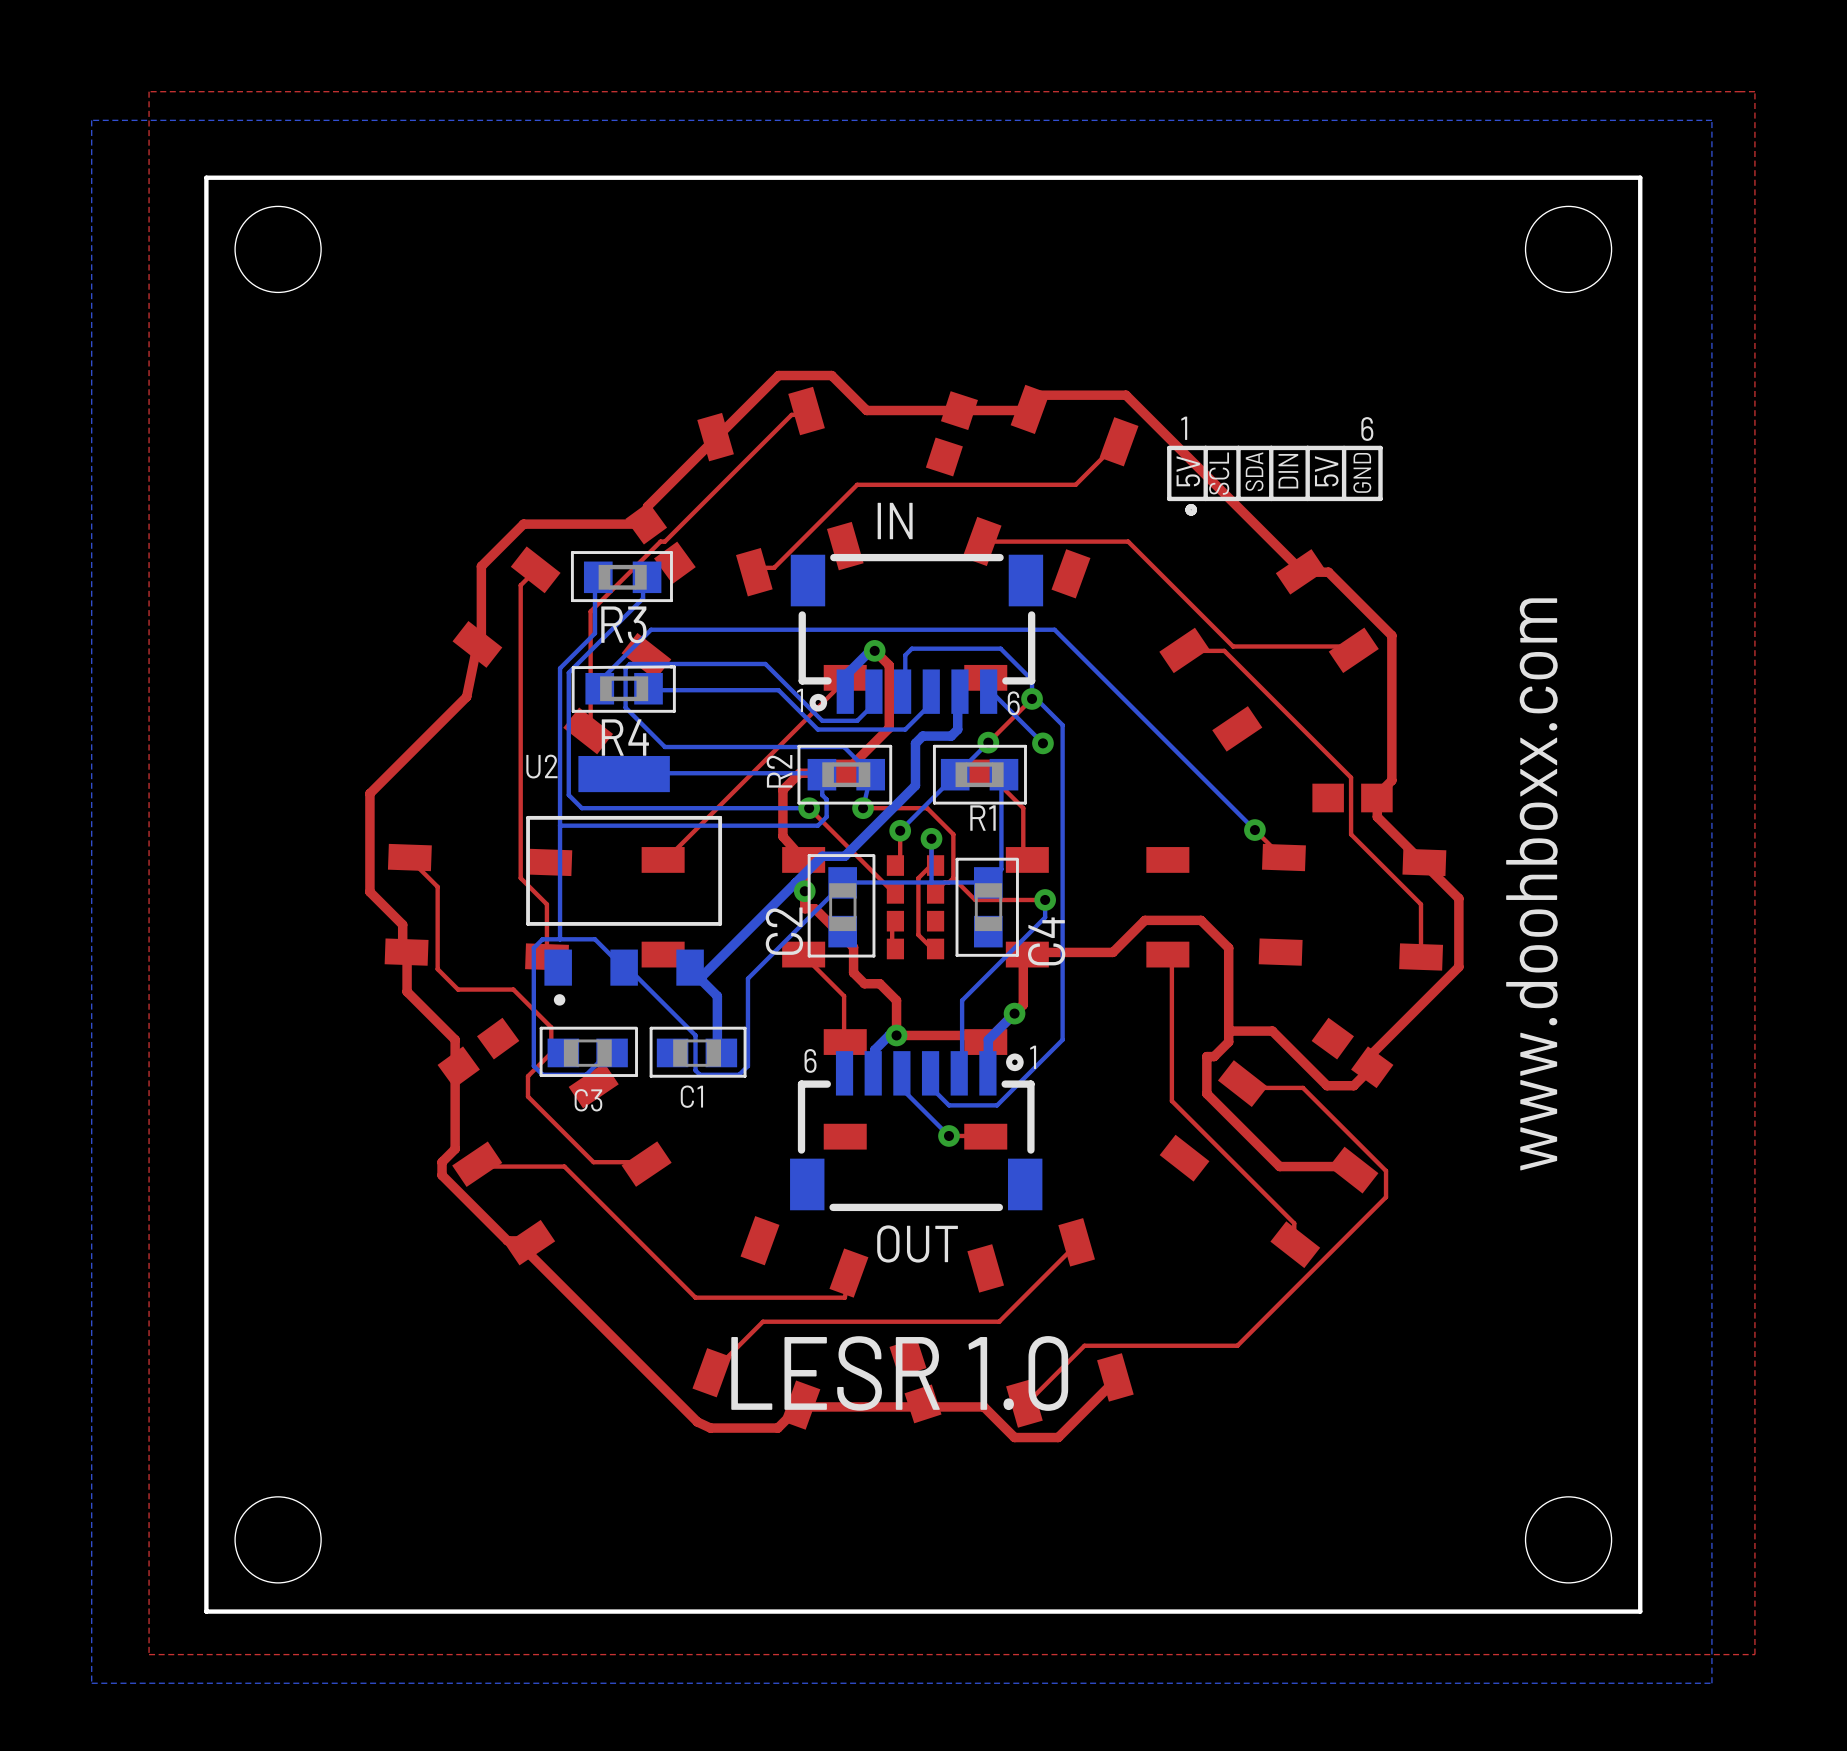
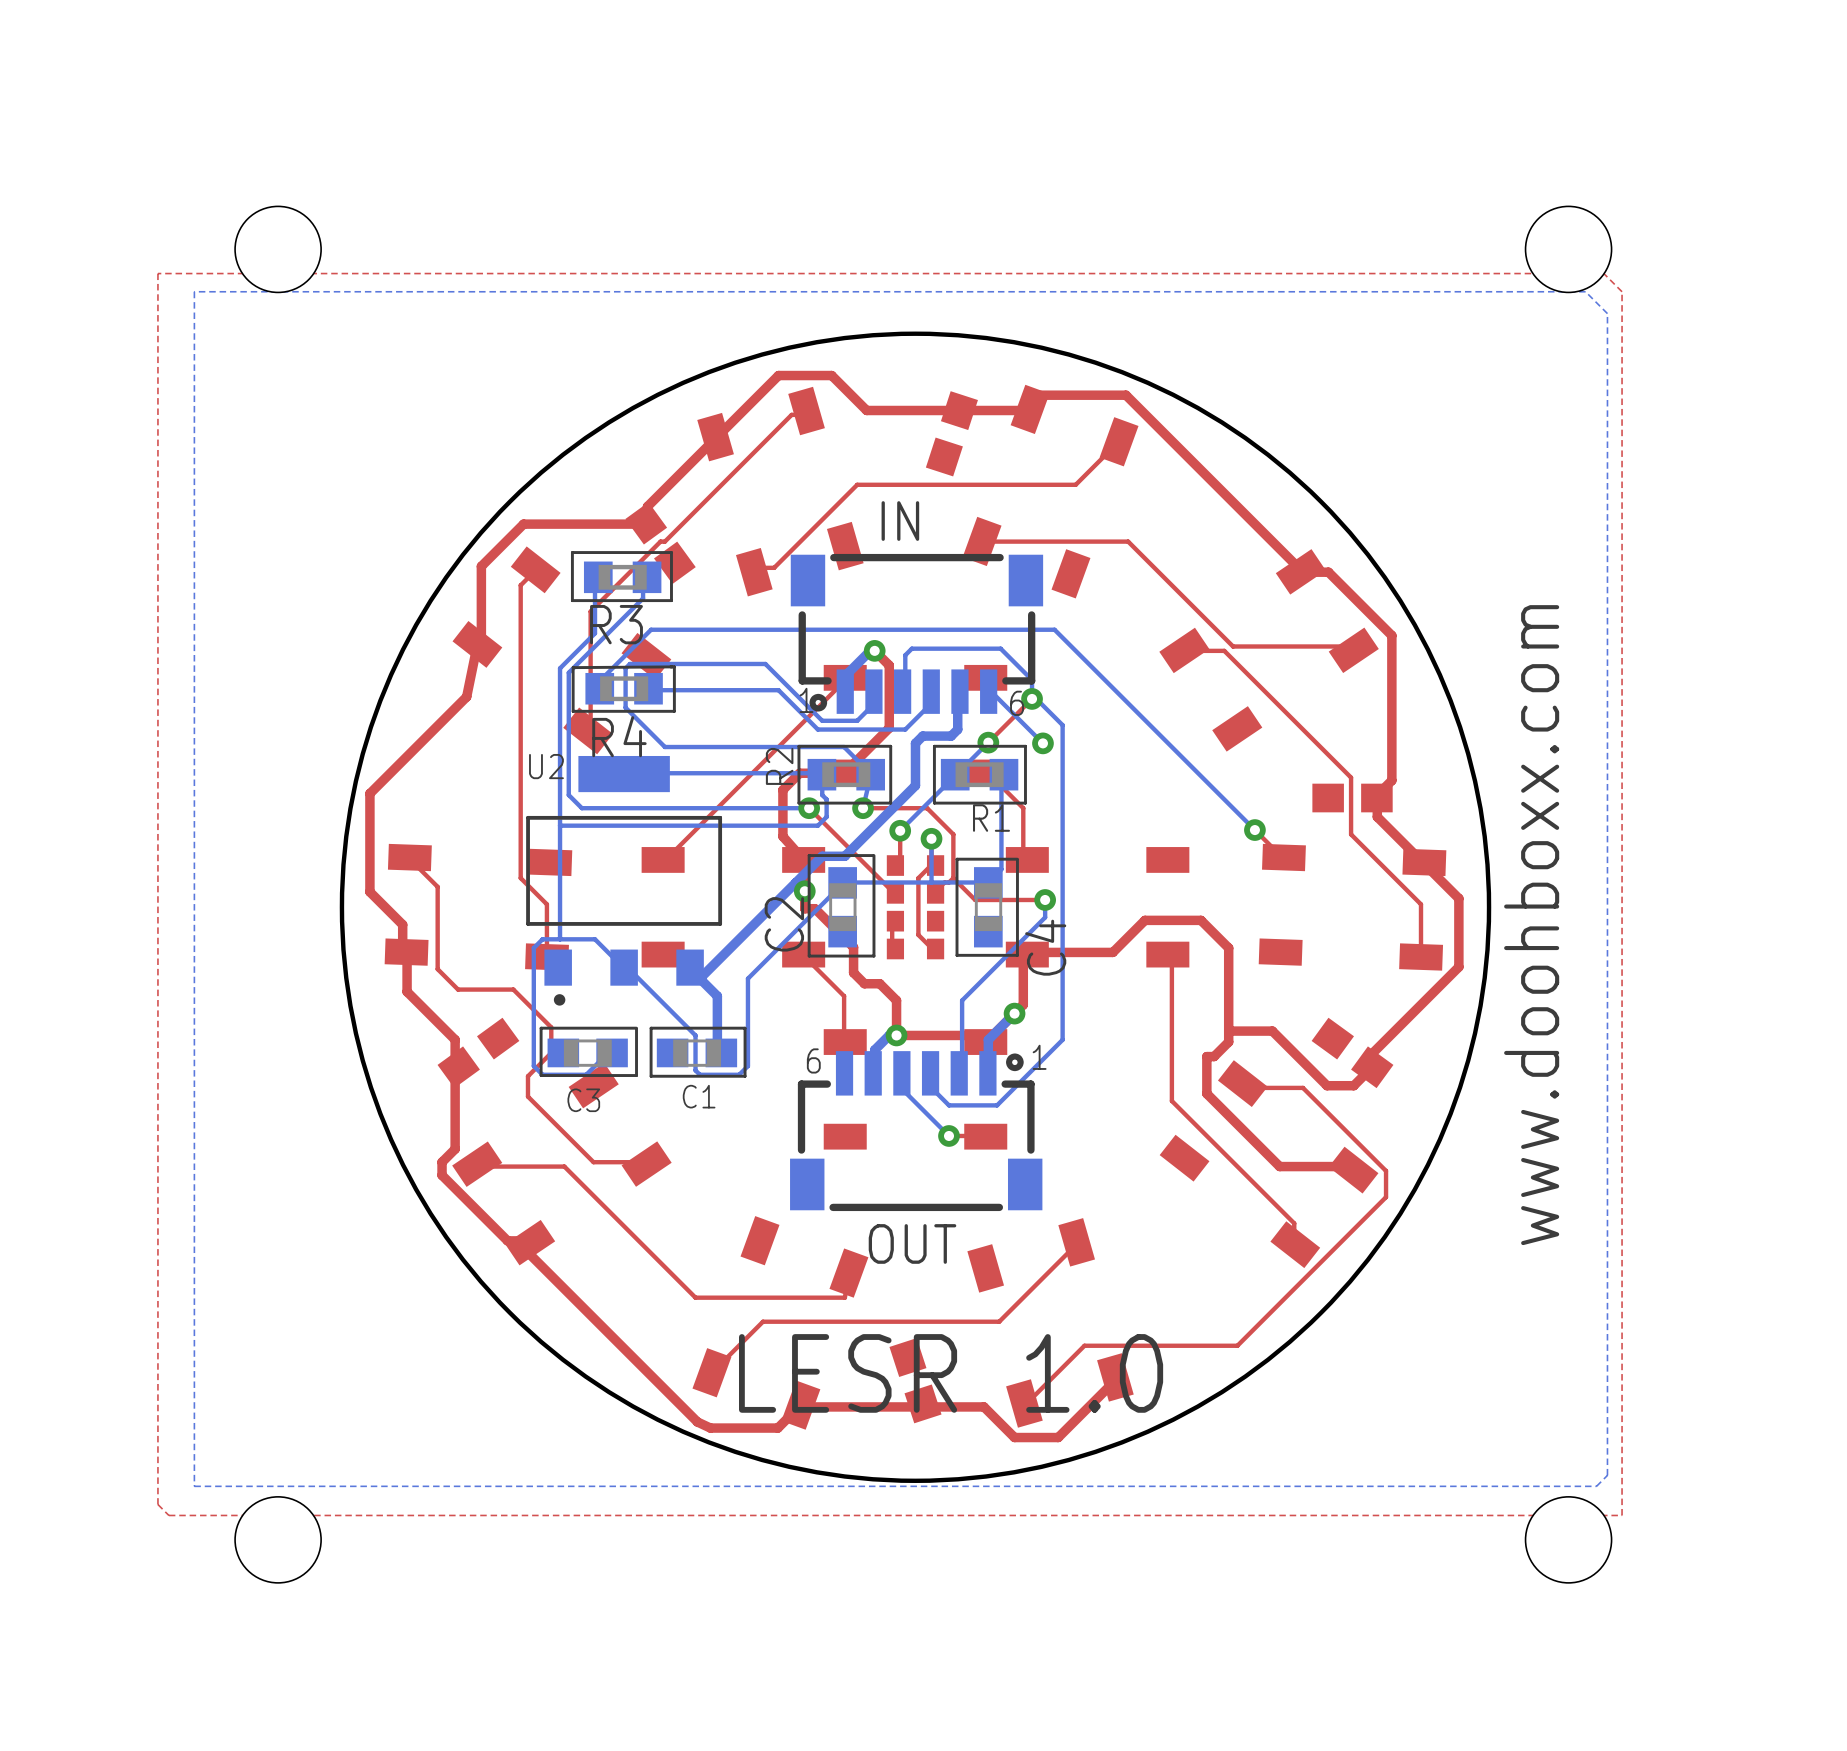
top zone outline: (1754, 91) (149, 91) (149, 1654) (1754, 1654) (1754, 91) -> (1603, 273) (1622, 291) (1622, 1515) (168, 1515) (157, 1504) (157, 273) (1603, 273)
bottom zone outline: (1711, 120) (91, 120) (91, 1683) (1711, 1683) (1711, 120) -> (1585, 291) (1607, 313) (1607, 1475) (1596, 1486) (194, 1486) (194, 291) (1585, 291)
board edge: (1640, 177) (206, 177) (206, 1611) (1640, 1611) (1640, 177) -> none
round board edge: none -> [339, 331, 1492, 1483]
text: 1 (1184, 428) -> none
text: 6 (1367, 428) -> none
line: (1205, 447) (1205, 498) -> none
line: (1238, 447) (1238, 498) -> none
line: (1271, 447) (1271, 498) -> none
line: (1307, 447) (1307, 498) -> none
line: (1344, 447) (1344, 498) -> none
line: (1380, 447) (1169, 447) (1169, 498) (1380, 498) (1380, 447) -> none
text: 5V (1188, 471) -> none
text: SDA (1254, 471) -> none
text: DIN (1288, 471) -> none
text: 5V (1326, 471) -> none
text: GND (1362, 472) -> none
text: SCL (1219, 473) -> none
drawing: [1185, 504, 1197, 516] -> none

